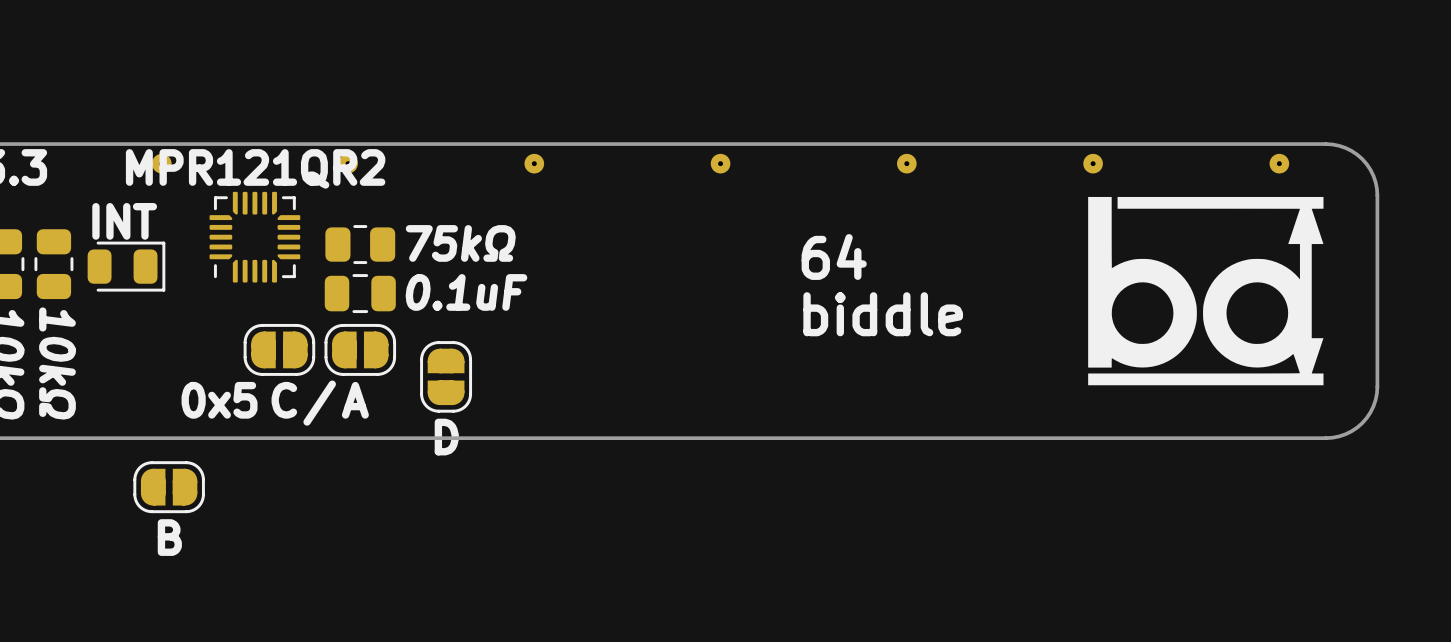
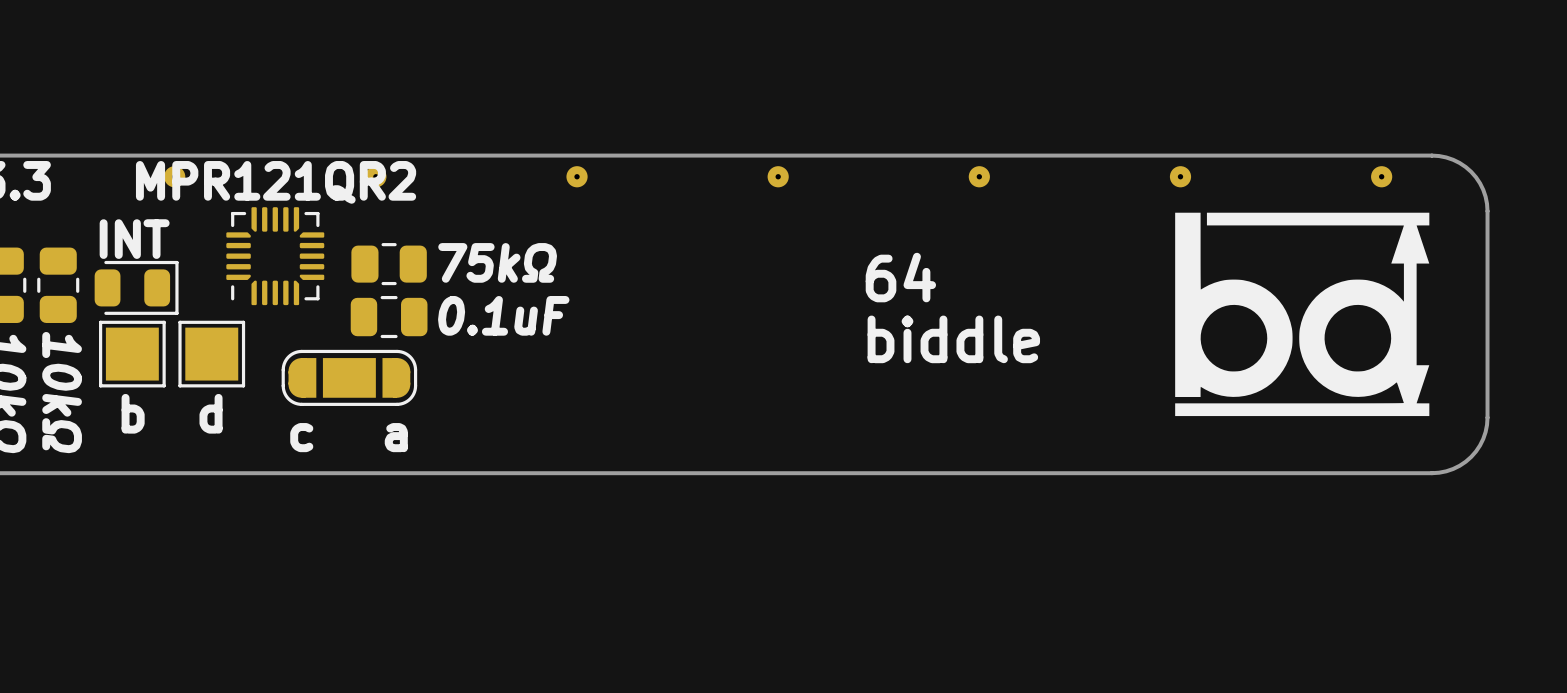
part: none -> b (132, 354)
part: none -> d (211, 354)
part: C (279, 349) -> none
part: none -> (349, 377)
part: A (360, 349) -> none
part: D (446, 376) -> none
text: 0x5 / (258, 403) -> none
part: B (169, 487) -> none

